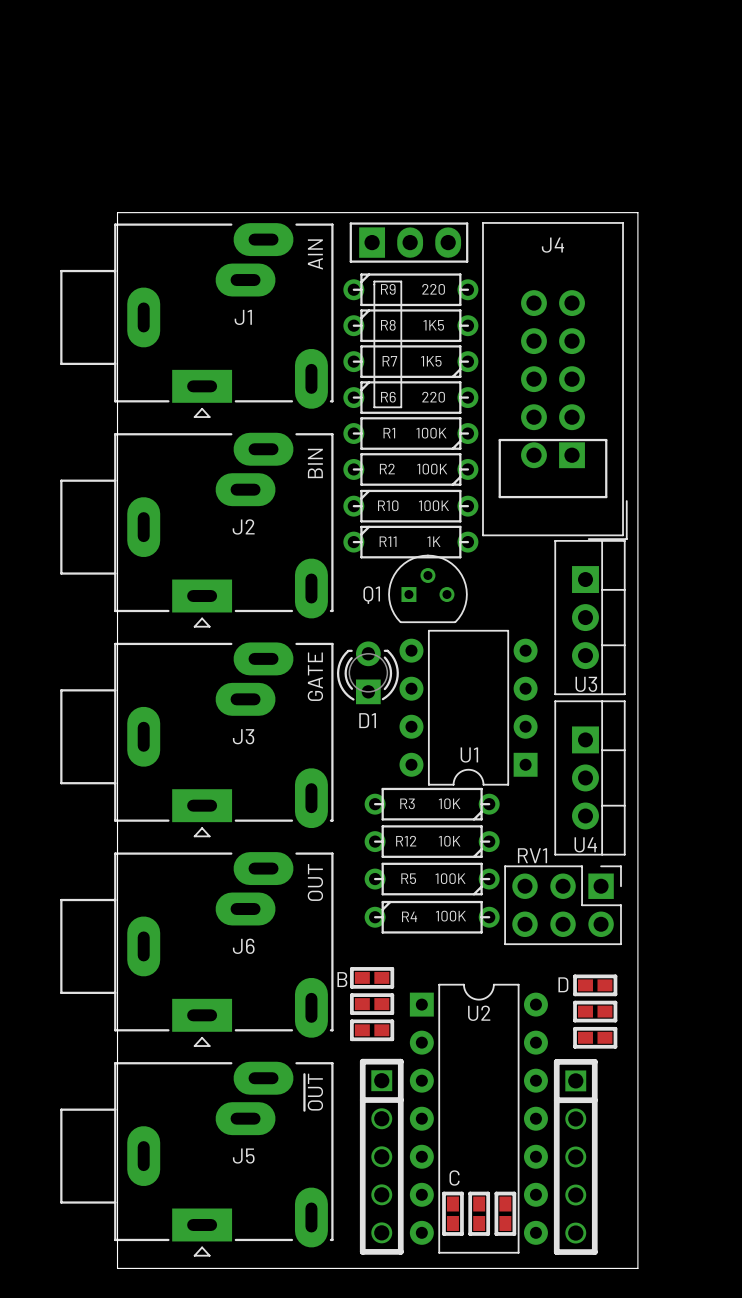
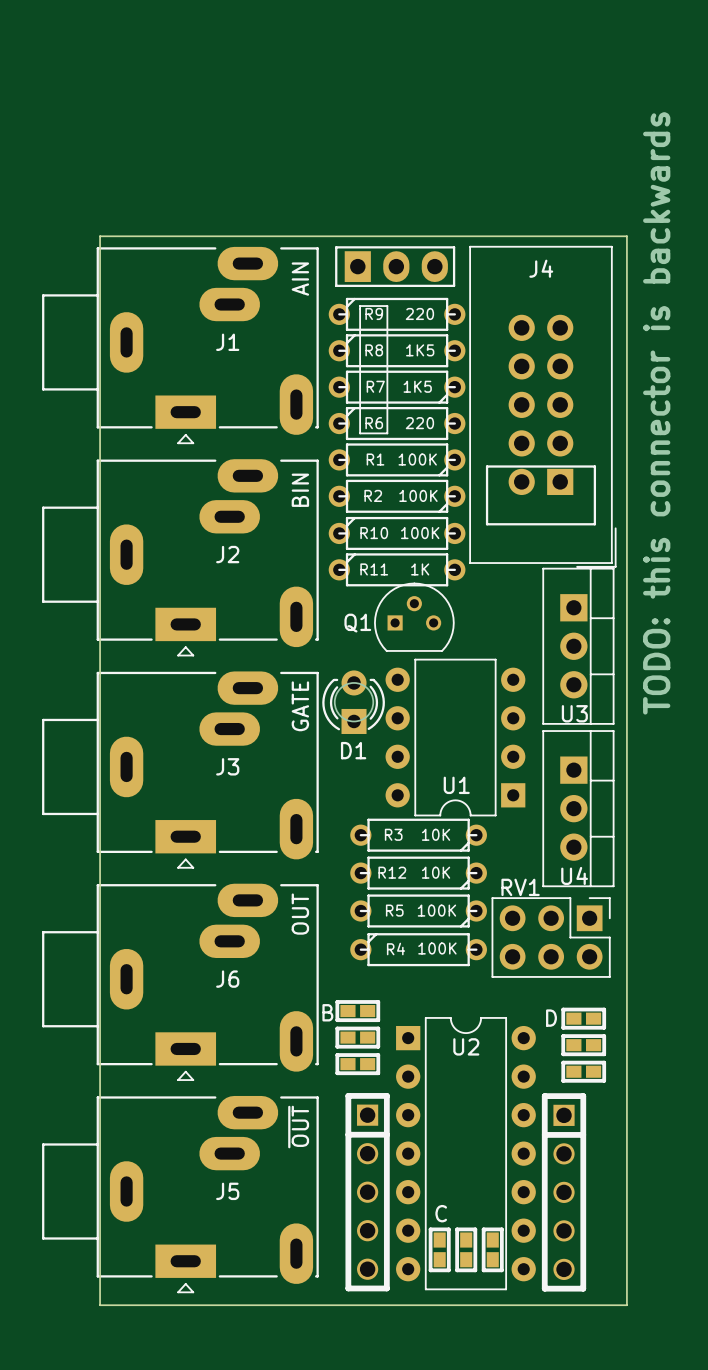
text: none -> TODO: this connector is backwards (656, 413)

